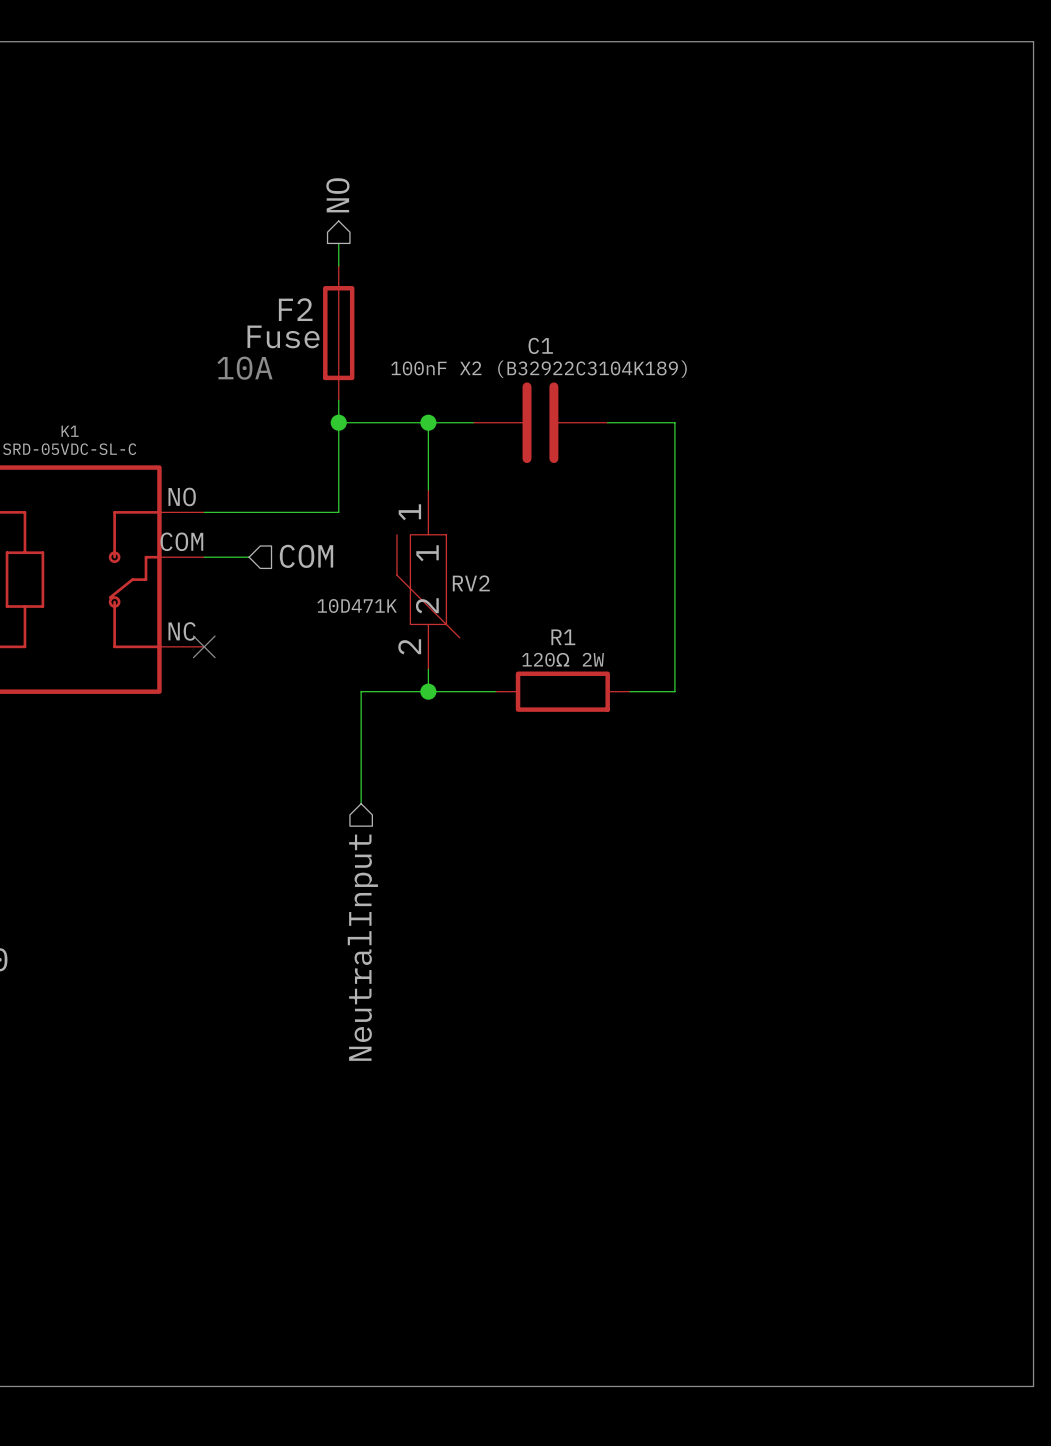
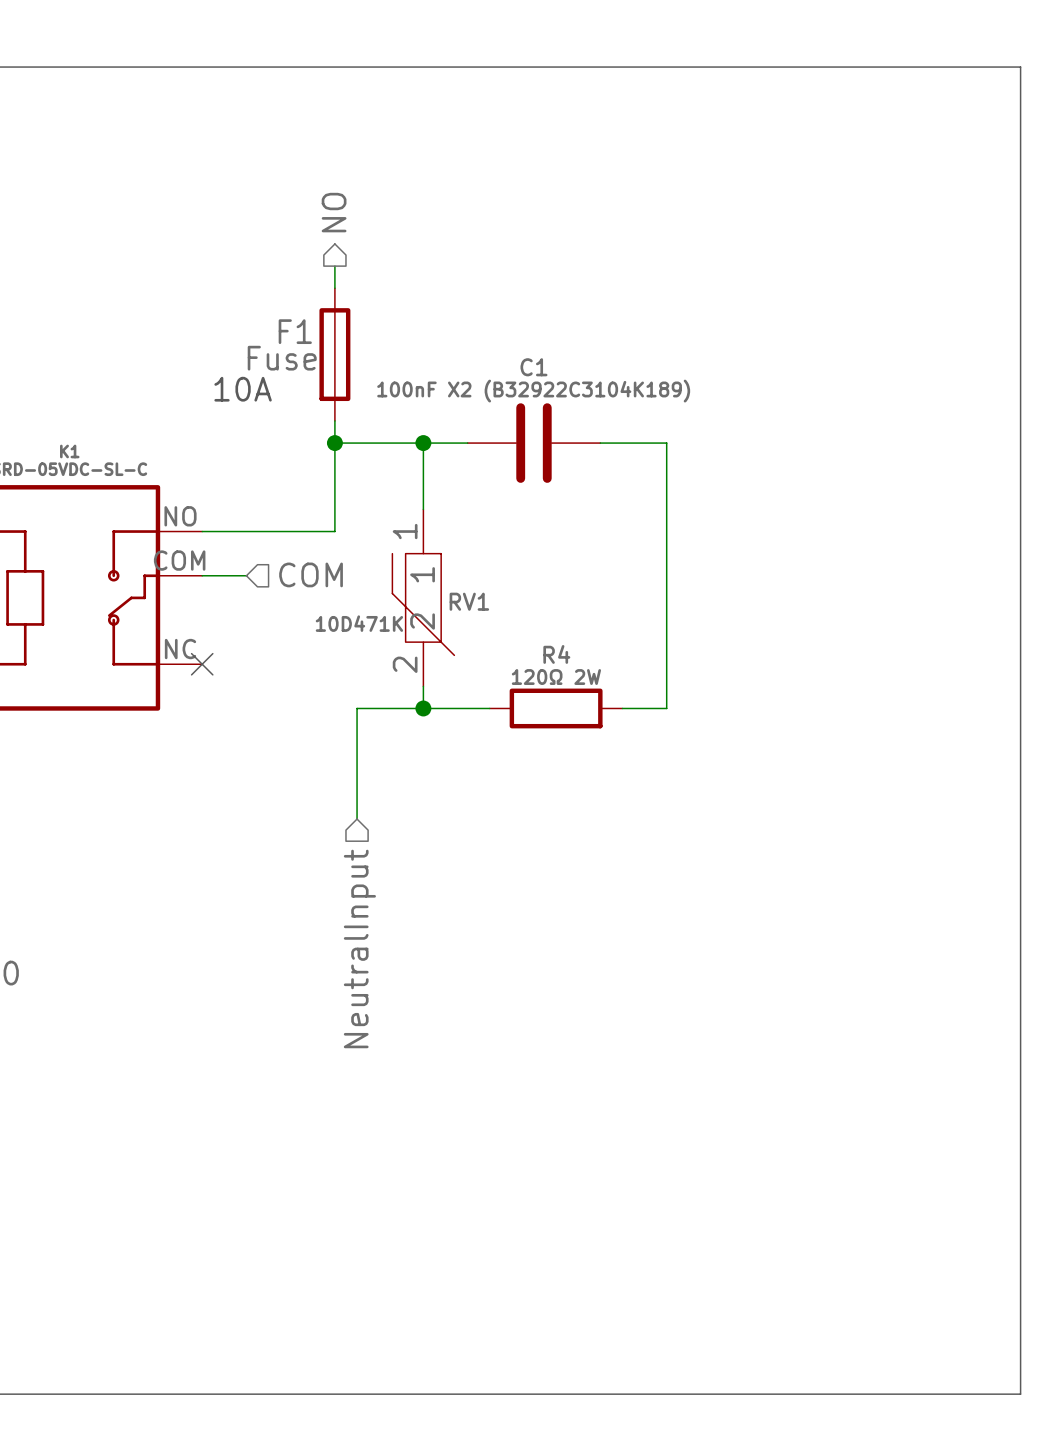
F2 name: F2 (295, 309) -> F1 (295, 331)
RV2 name: RV2 (471, 583) -> RV1 (469, 601)
R1 name: R1 (563, 637) -> R4 (556, 654)

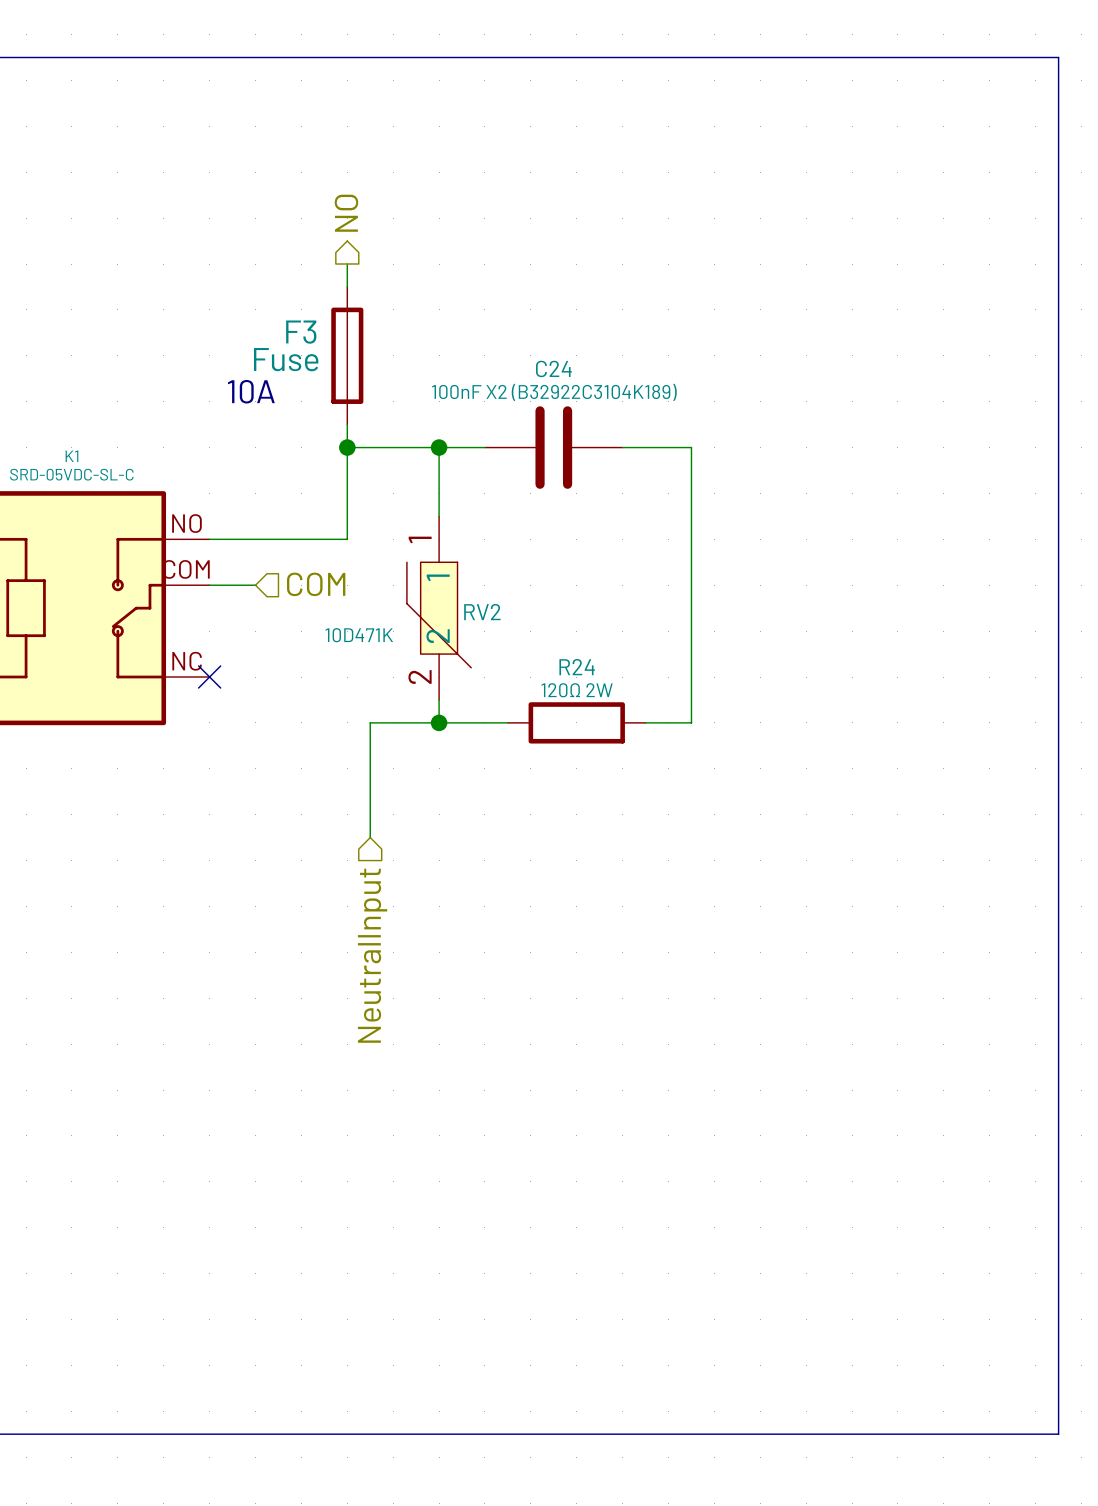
F1 name: F1 (295, 331) -> F3 (301, 332)
C1 name: C1 (533, 367) -> C24 (553, 368)
RV1 name: RV1 (469, 601) -> RV2 (482, 612)
R4 name: R4 (556, 654) -> R24 (577, 667)

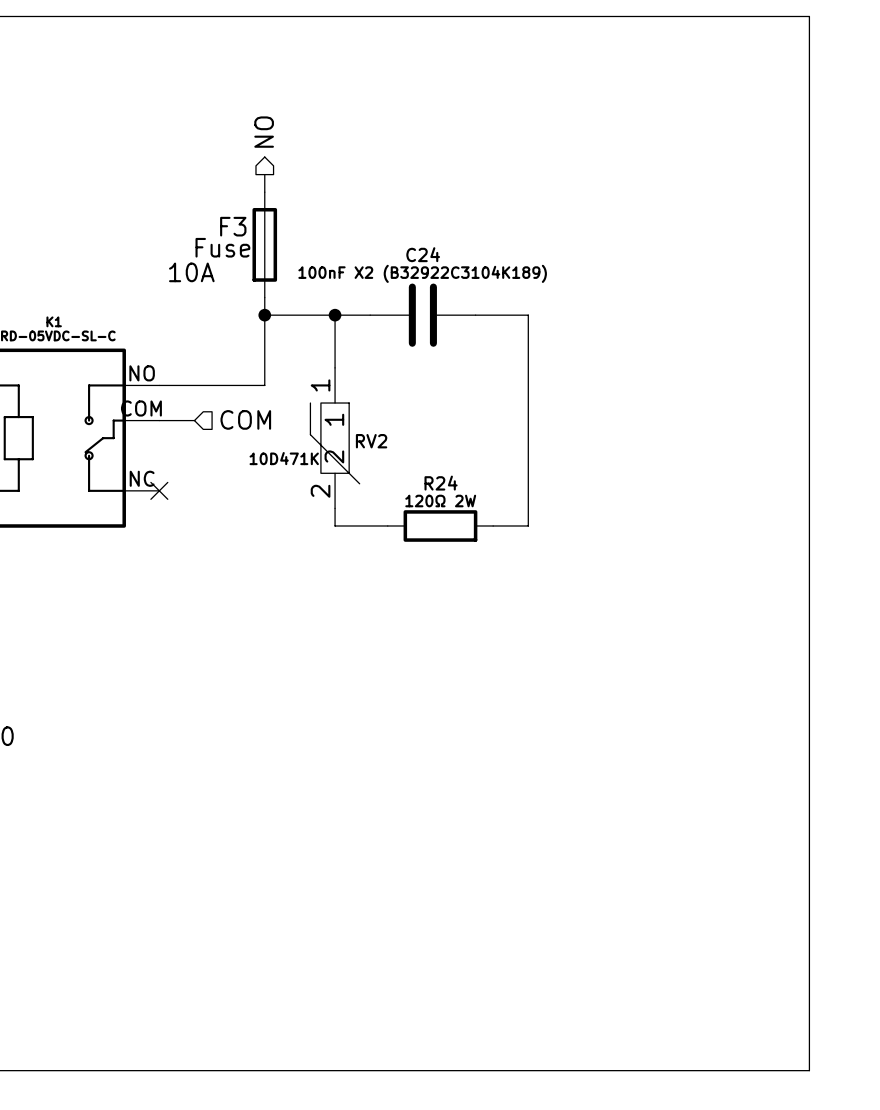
wire: (439, 722) (370, 722) (370, 837) -> none
junction: (439, 722) -> none
hierarchical label: NeutralInput (372, 955) -> none

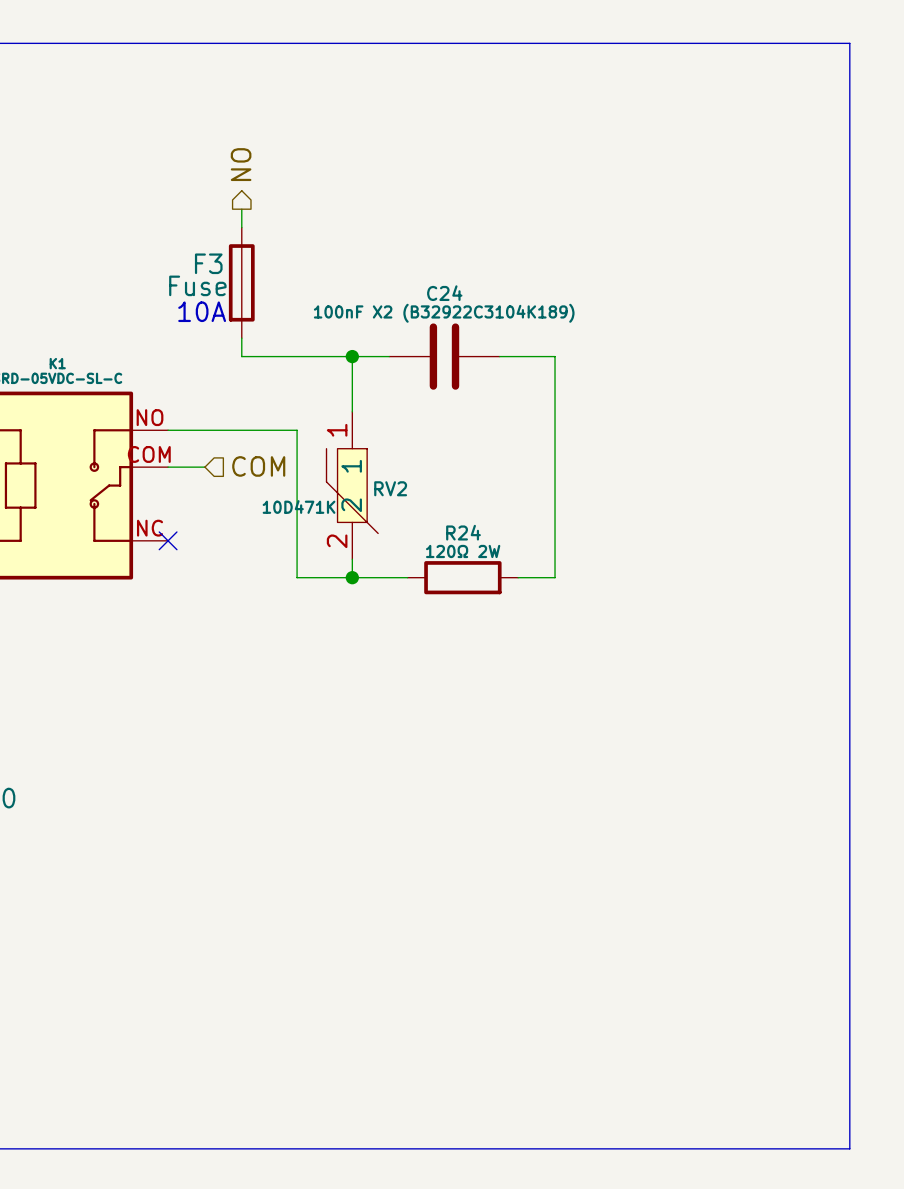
hierarchical label position: NO (264, 132) -> NO (241, 164)
wire: (264, 174) (264, 192) -> (241, 209) (241, 227)
F3 position: (264, 244) -> (241, 282)
wire: none -> (241, 338) (241, 356) (278, 356)
wire: (264, 297) (264, 385) -> (352, 577) (297, 577) (297, 430) (278, 430)
junction: (264, 315) -> none
junction: none -> (352, 577)

